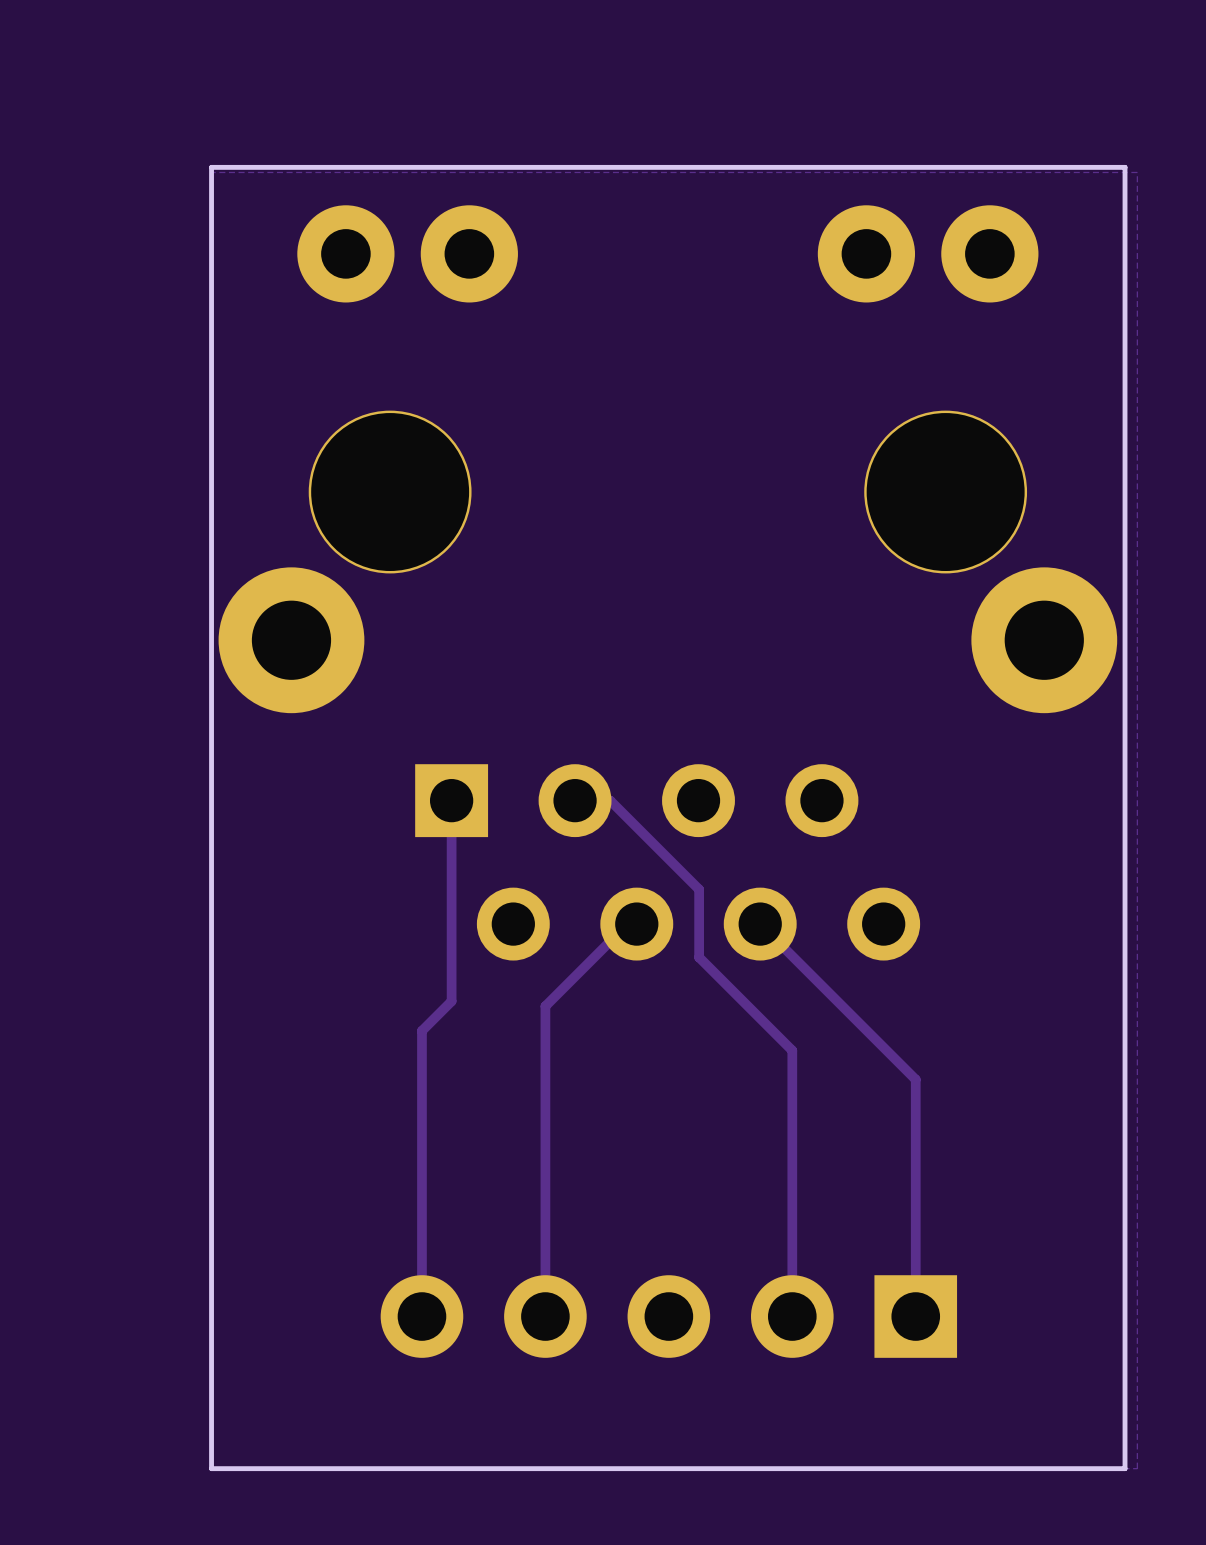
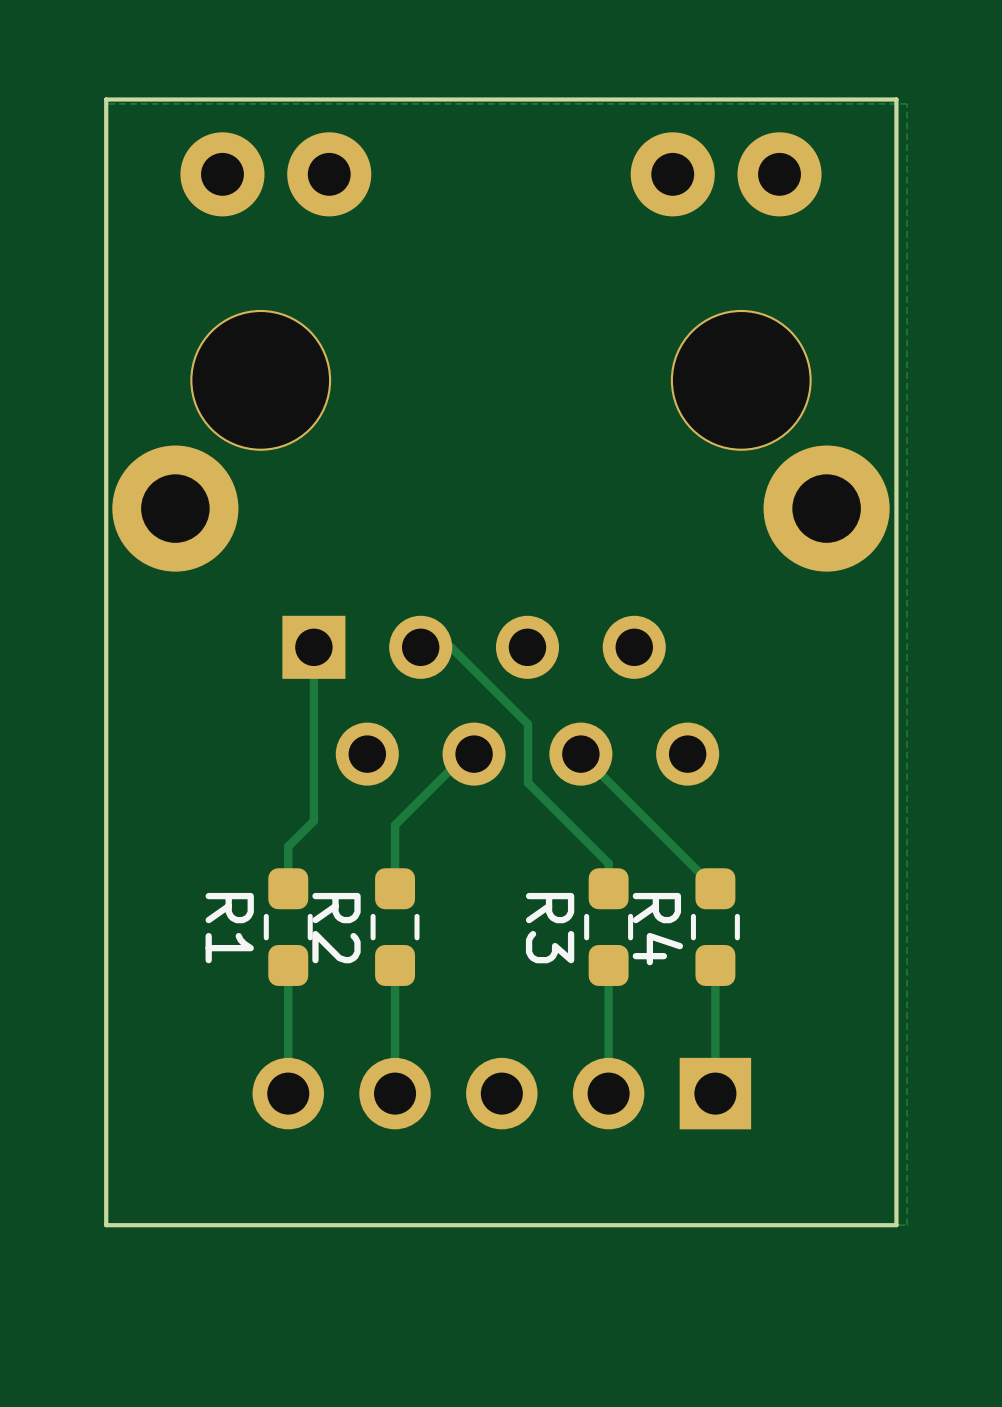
track: (421, 1079) (421, 1168) -> none
track: (545, 1079) (545, 1168) -> none
track: (792, 1079) (792, 1168) -> none
track: (915, 1079) (915, 1168) -> none
R1: none -> (288, 927)
R2: none -> (395, 927)
R3: none -> (608, 927)
R4: none -> (715, 927)

